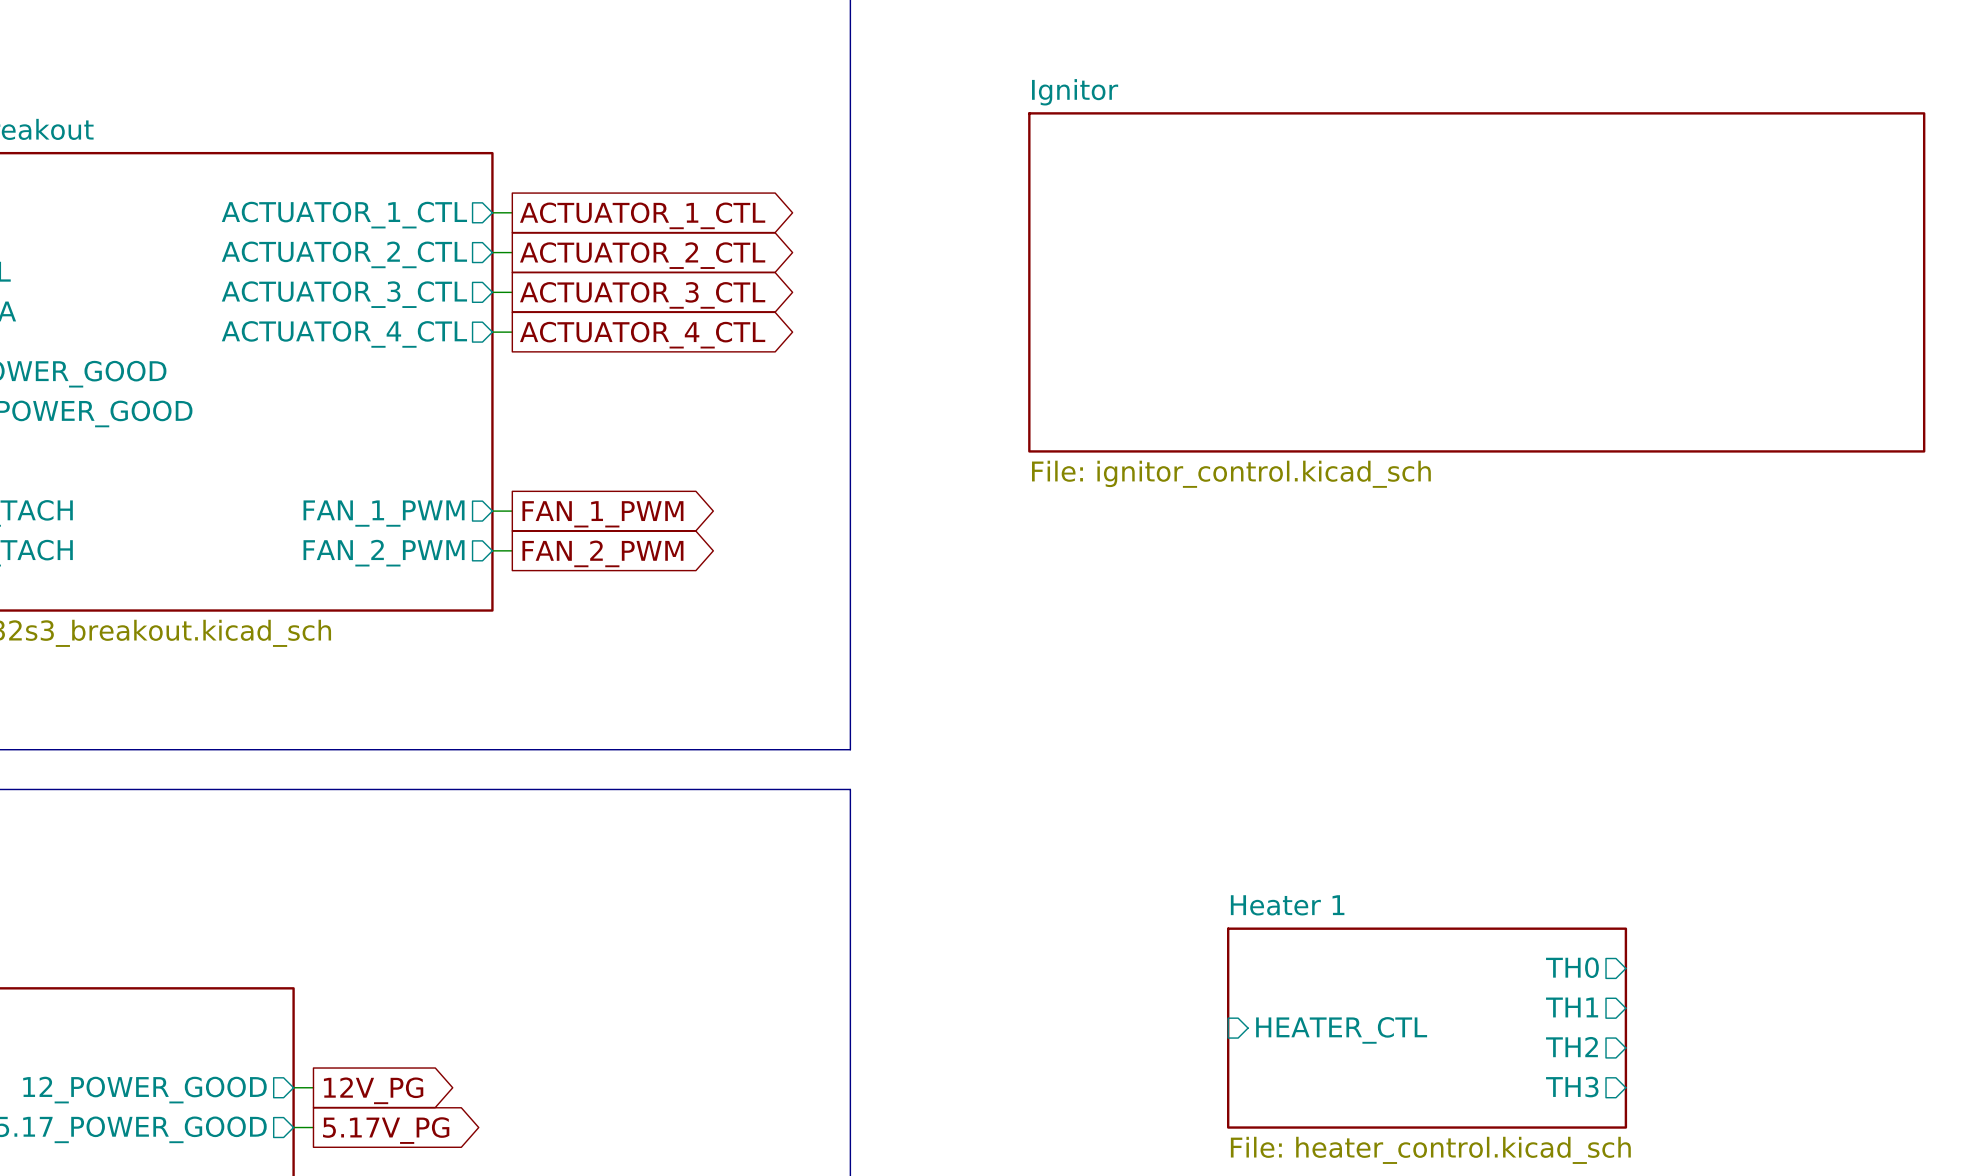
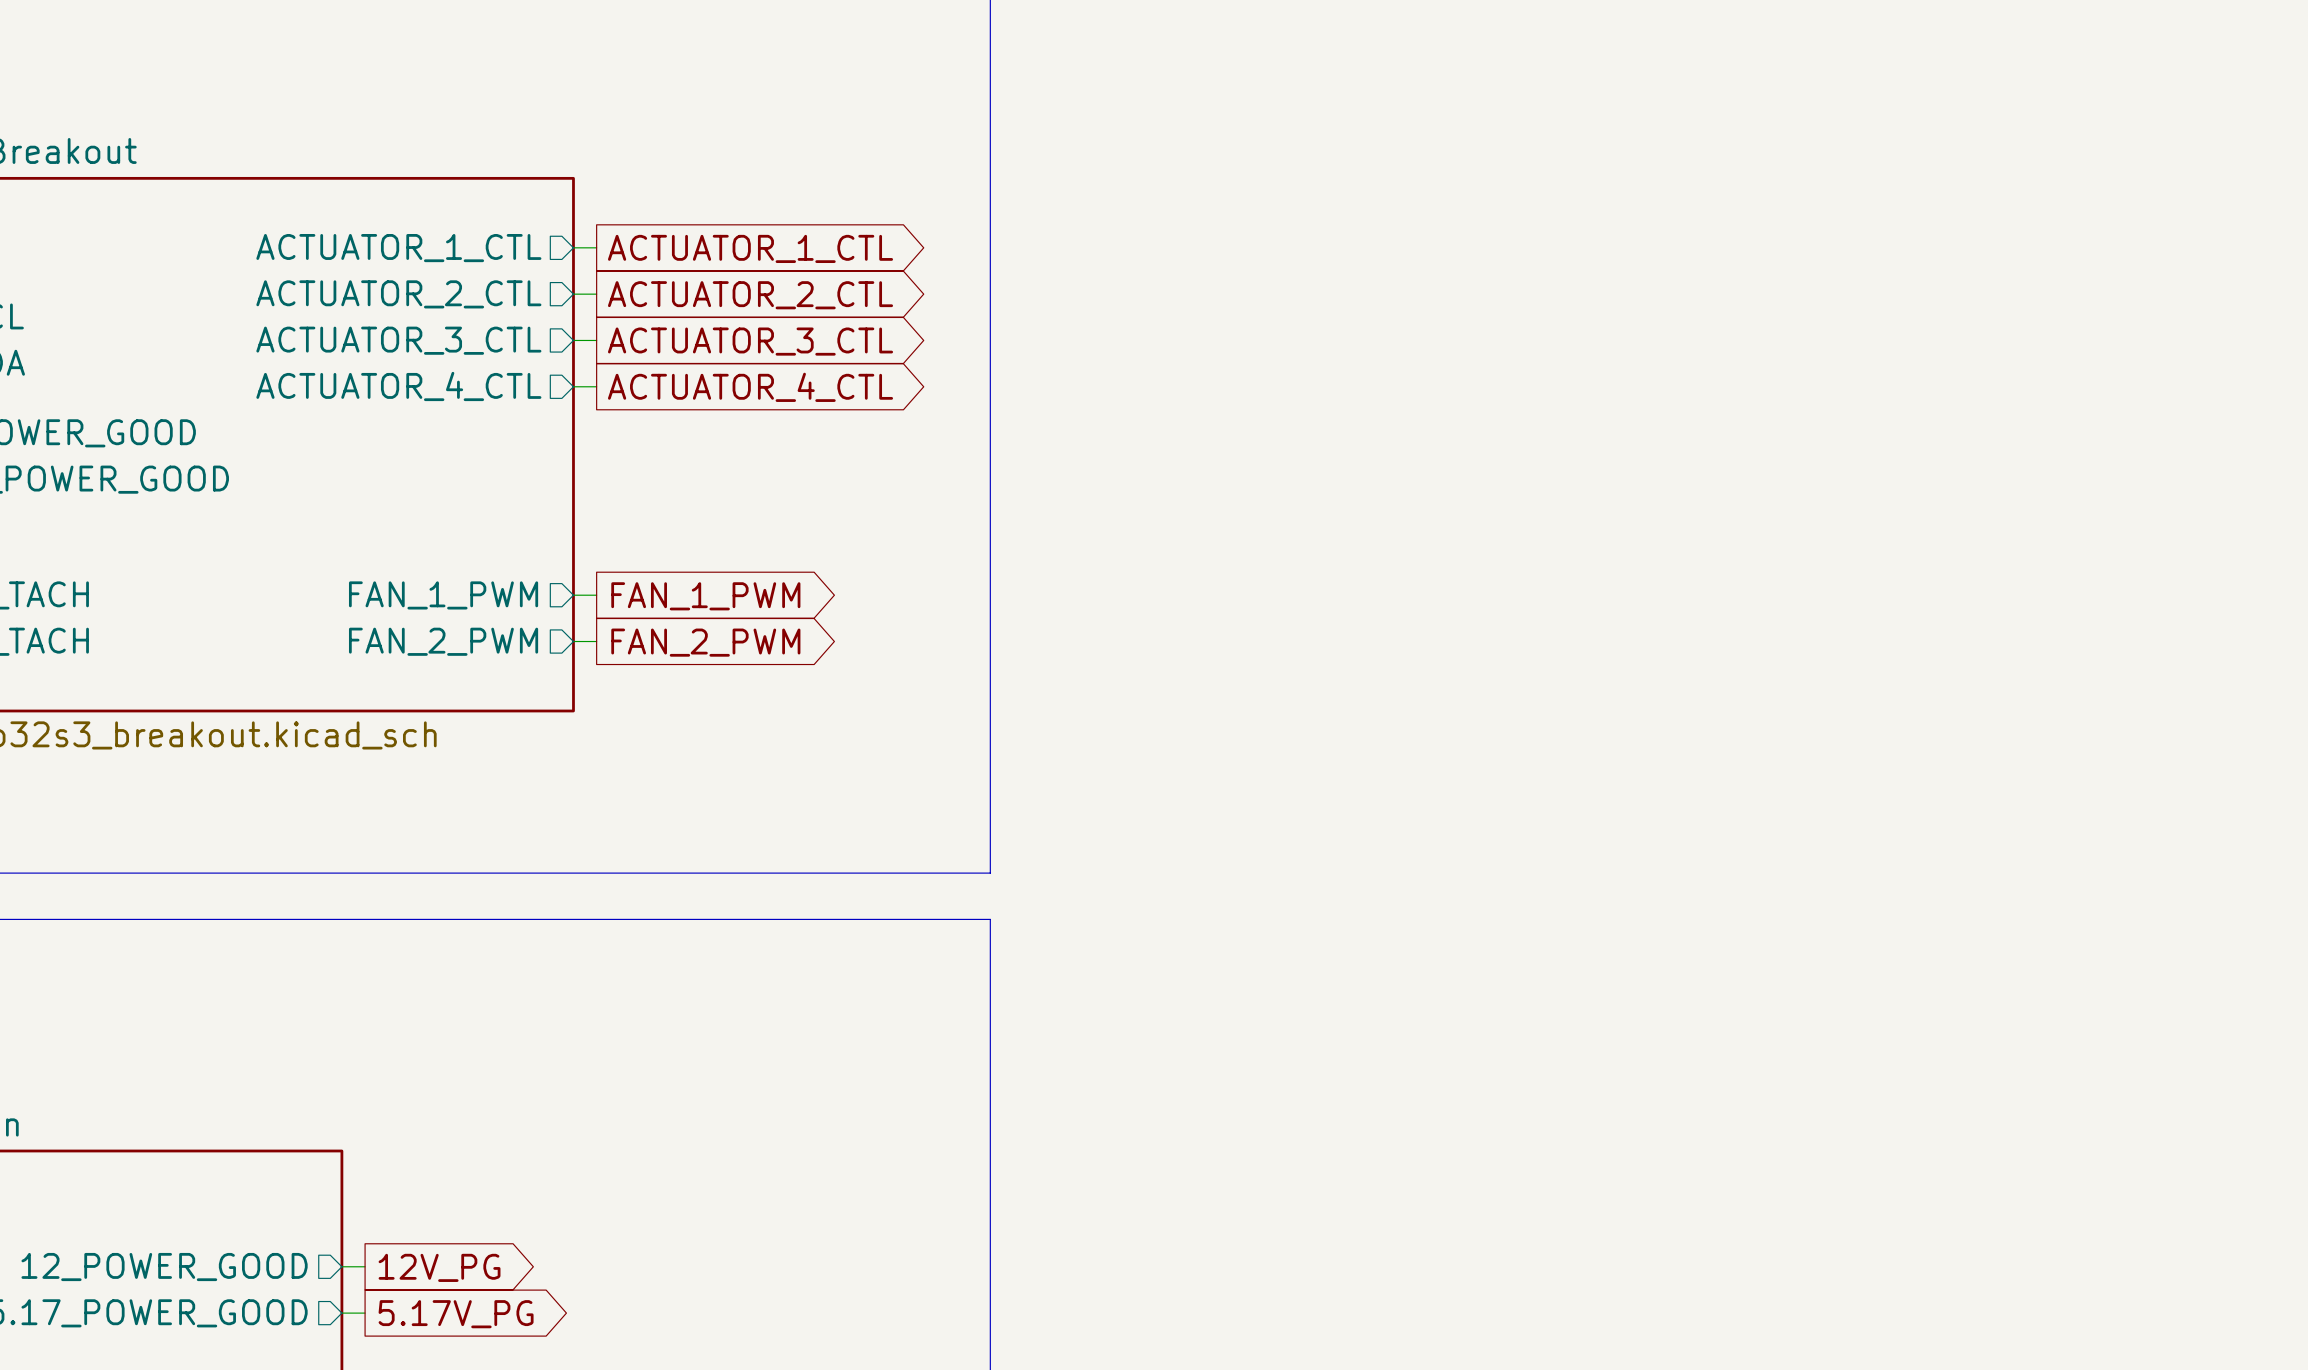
sheet Ignitor: File: ignitor_control.kicad_sch (1476, 282) -> none
sheet pin: TH0 (1572, 967) -> none
sheet pin: TH1 (1572, 1007) -> none
sheet Heater 1: File: heater_control.kicad_sch (1427, 1028) -> none
sheet pin: HEATER_CTL (1341, 1030) -> none
sheet pin: TH2 (1571, 1047) -> none
sheet pin: TH3 (1572, 1087) -> none

